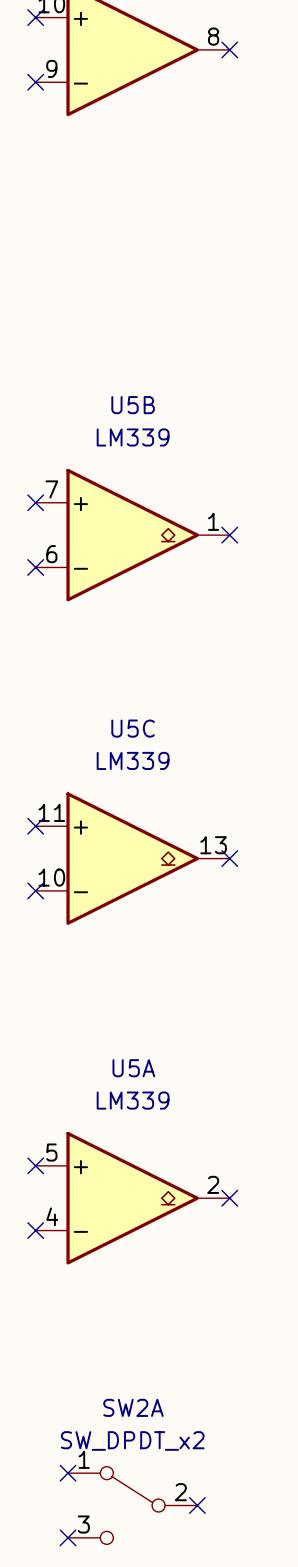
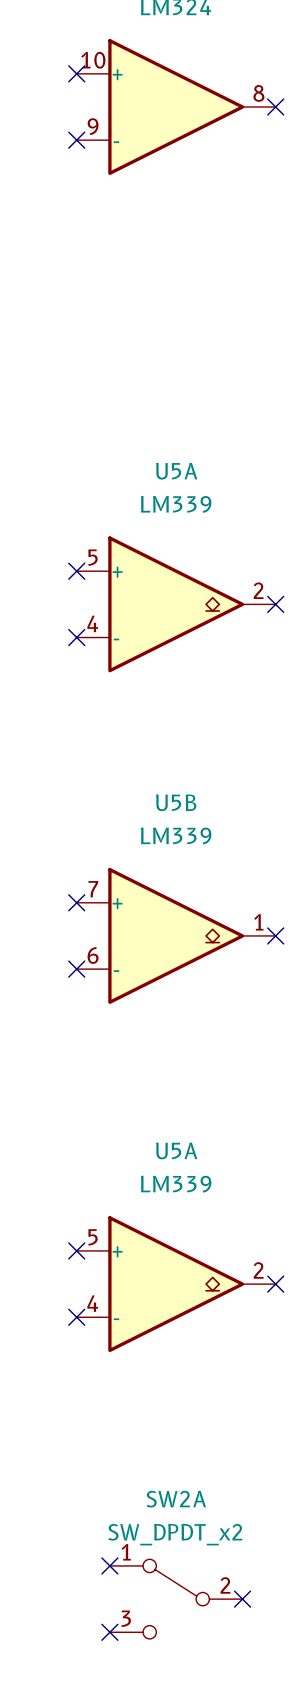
U5B position: (132, 535) -> (176, 935)
U5A: none -> LM339 (176, 604)
U5C: LM339 (132, 858) -> none

